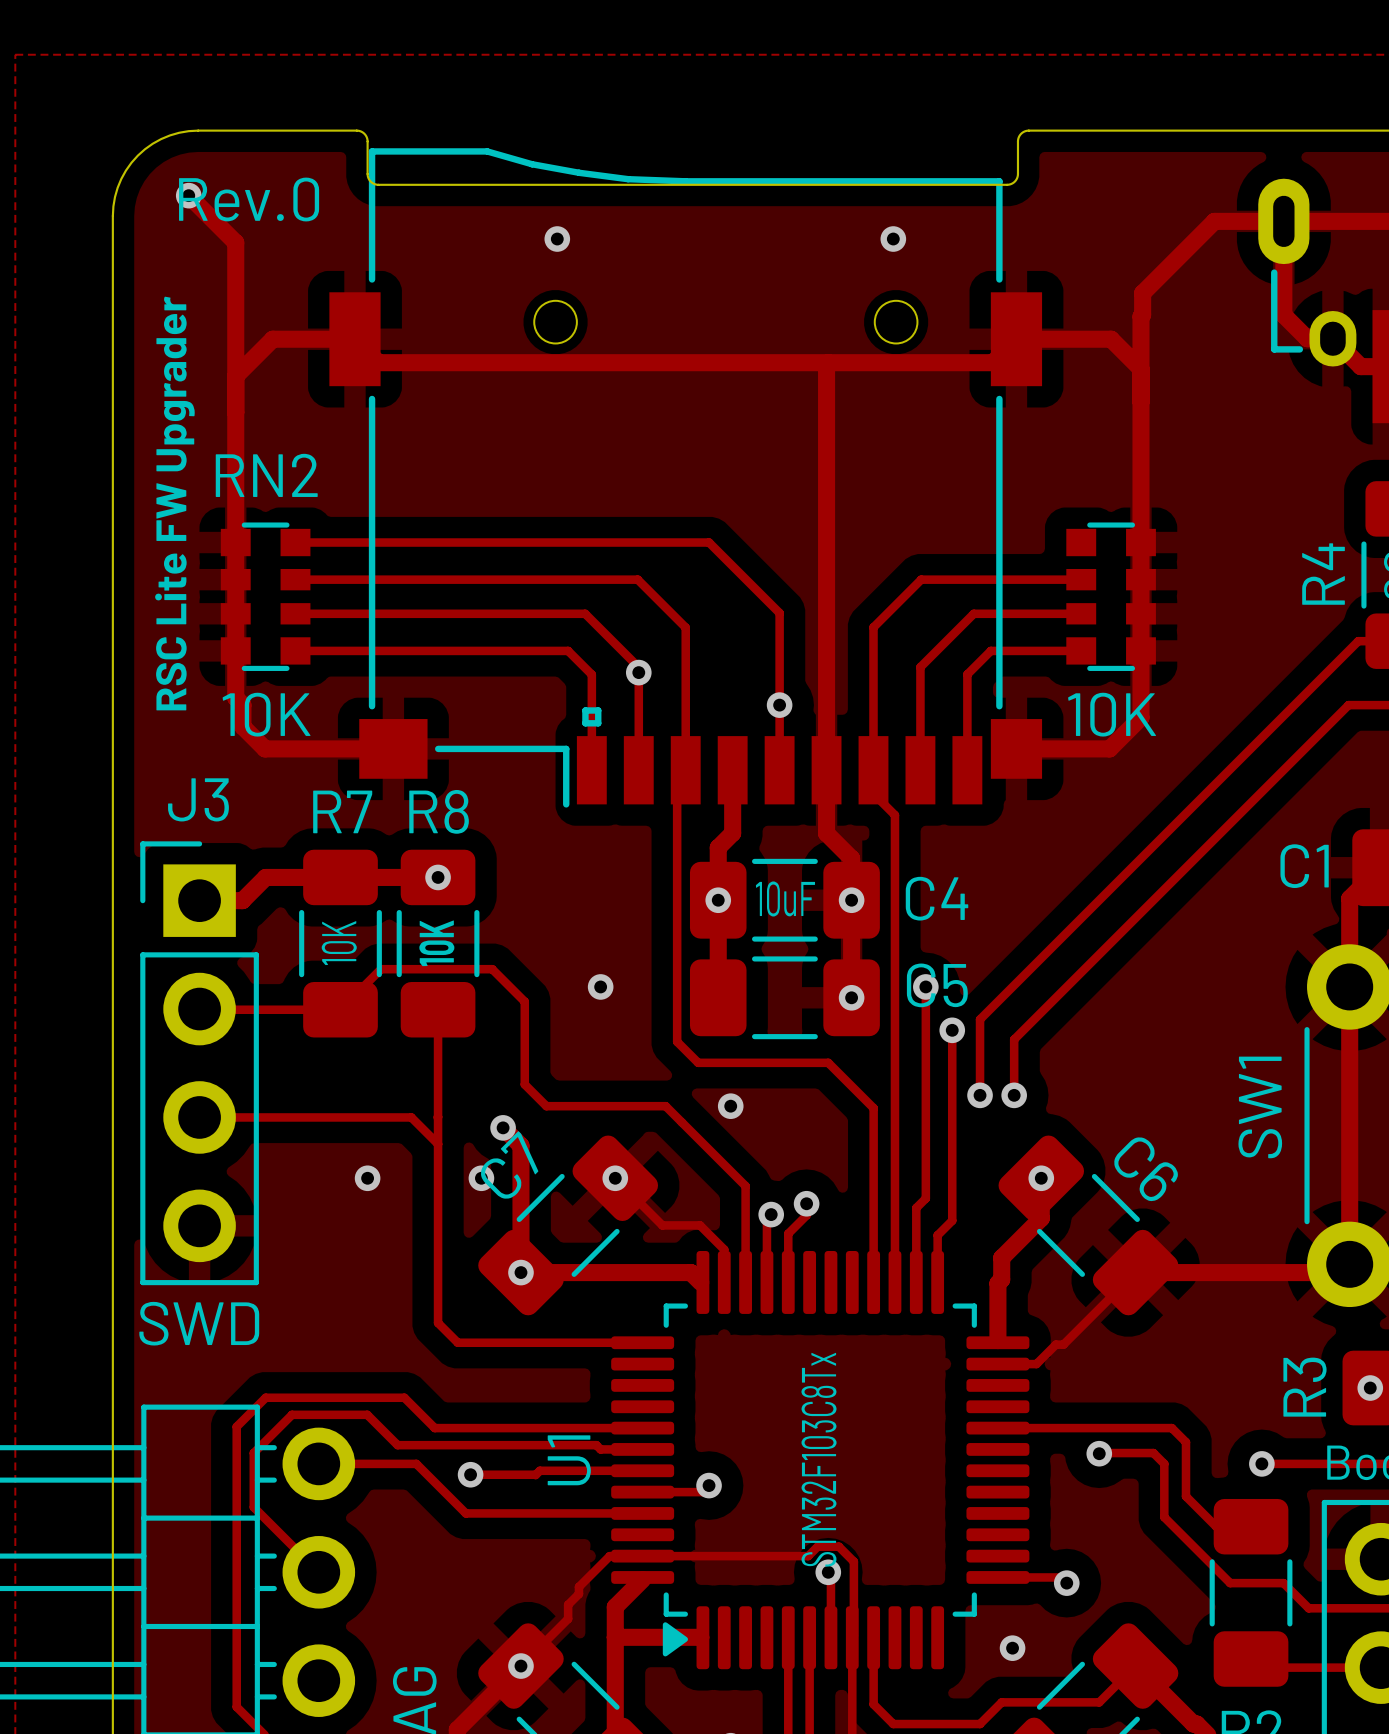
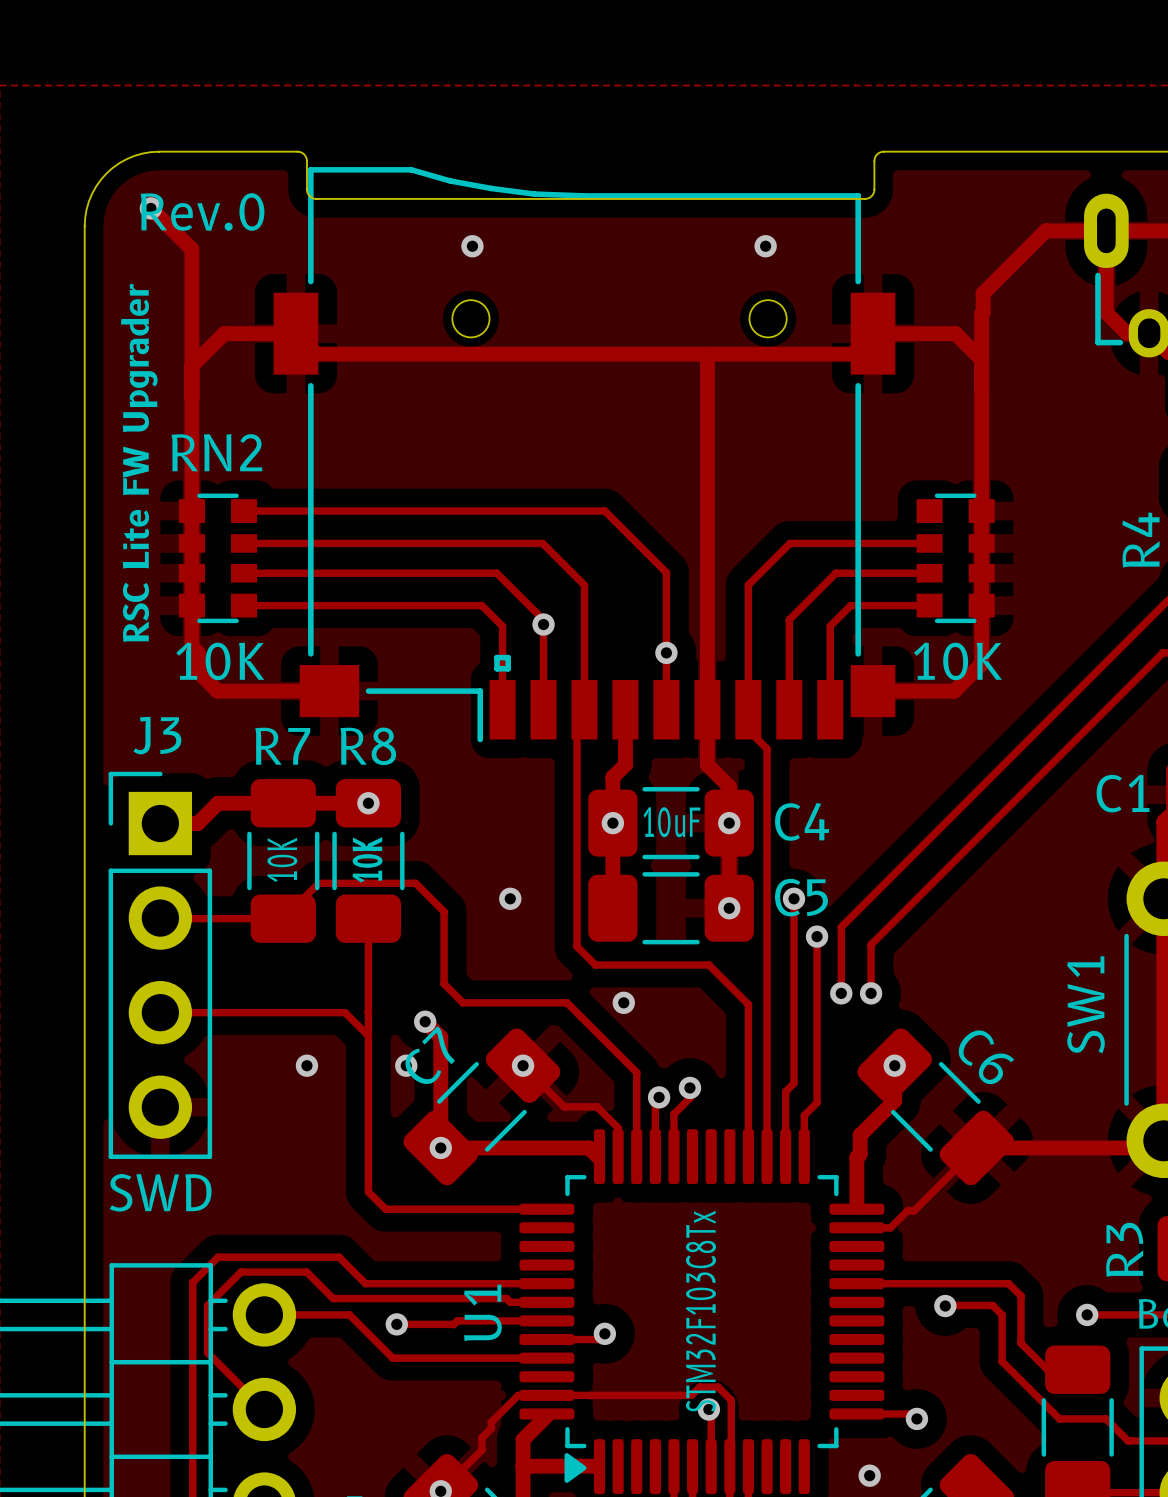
text position: RSC Lite FW Upgrader (174, 503) -> RSC Lite FW Upgrader (139, 463)

